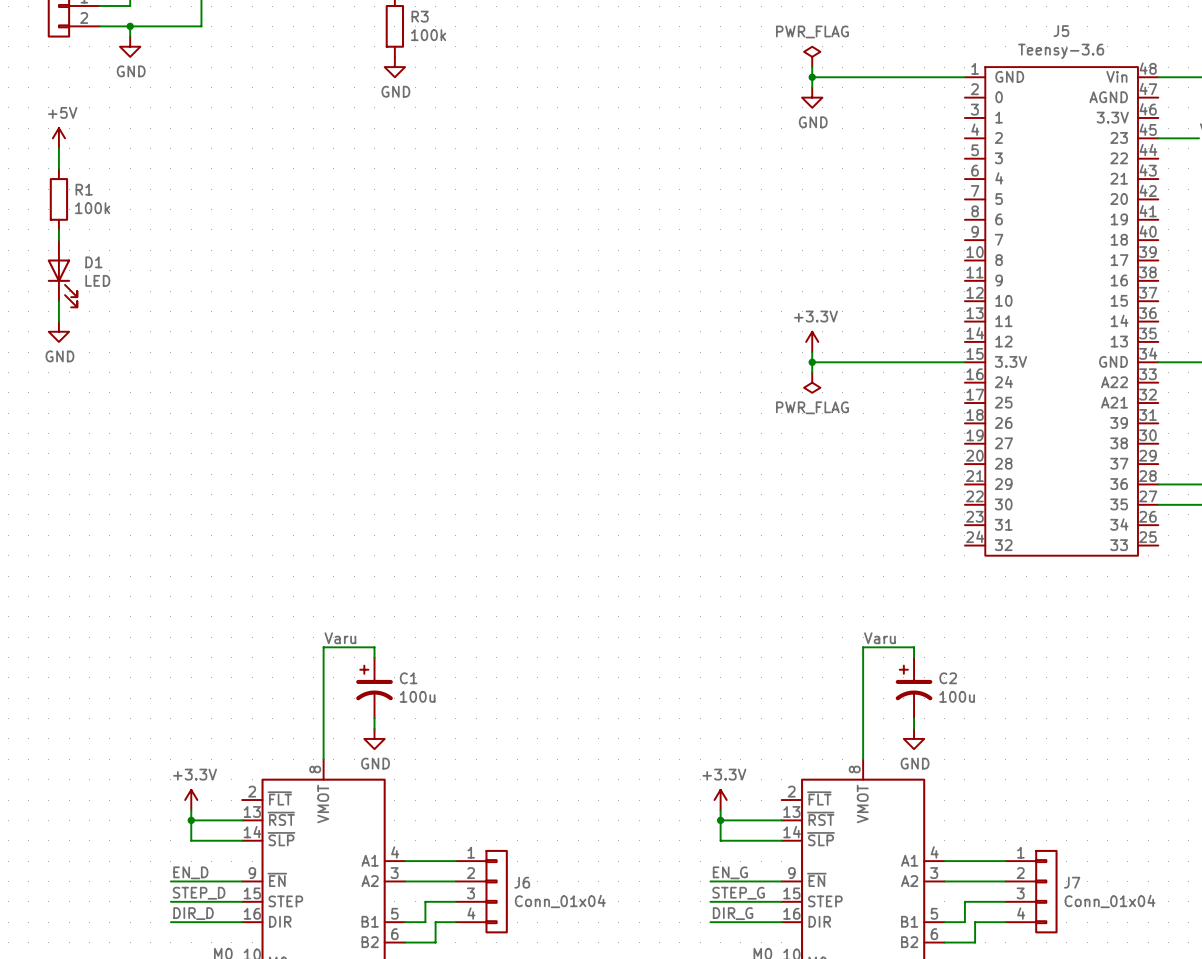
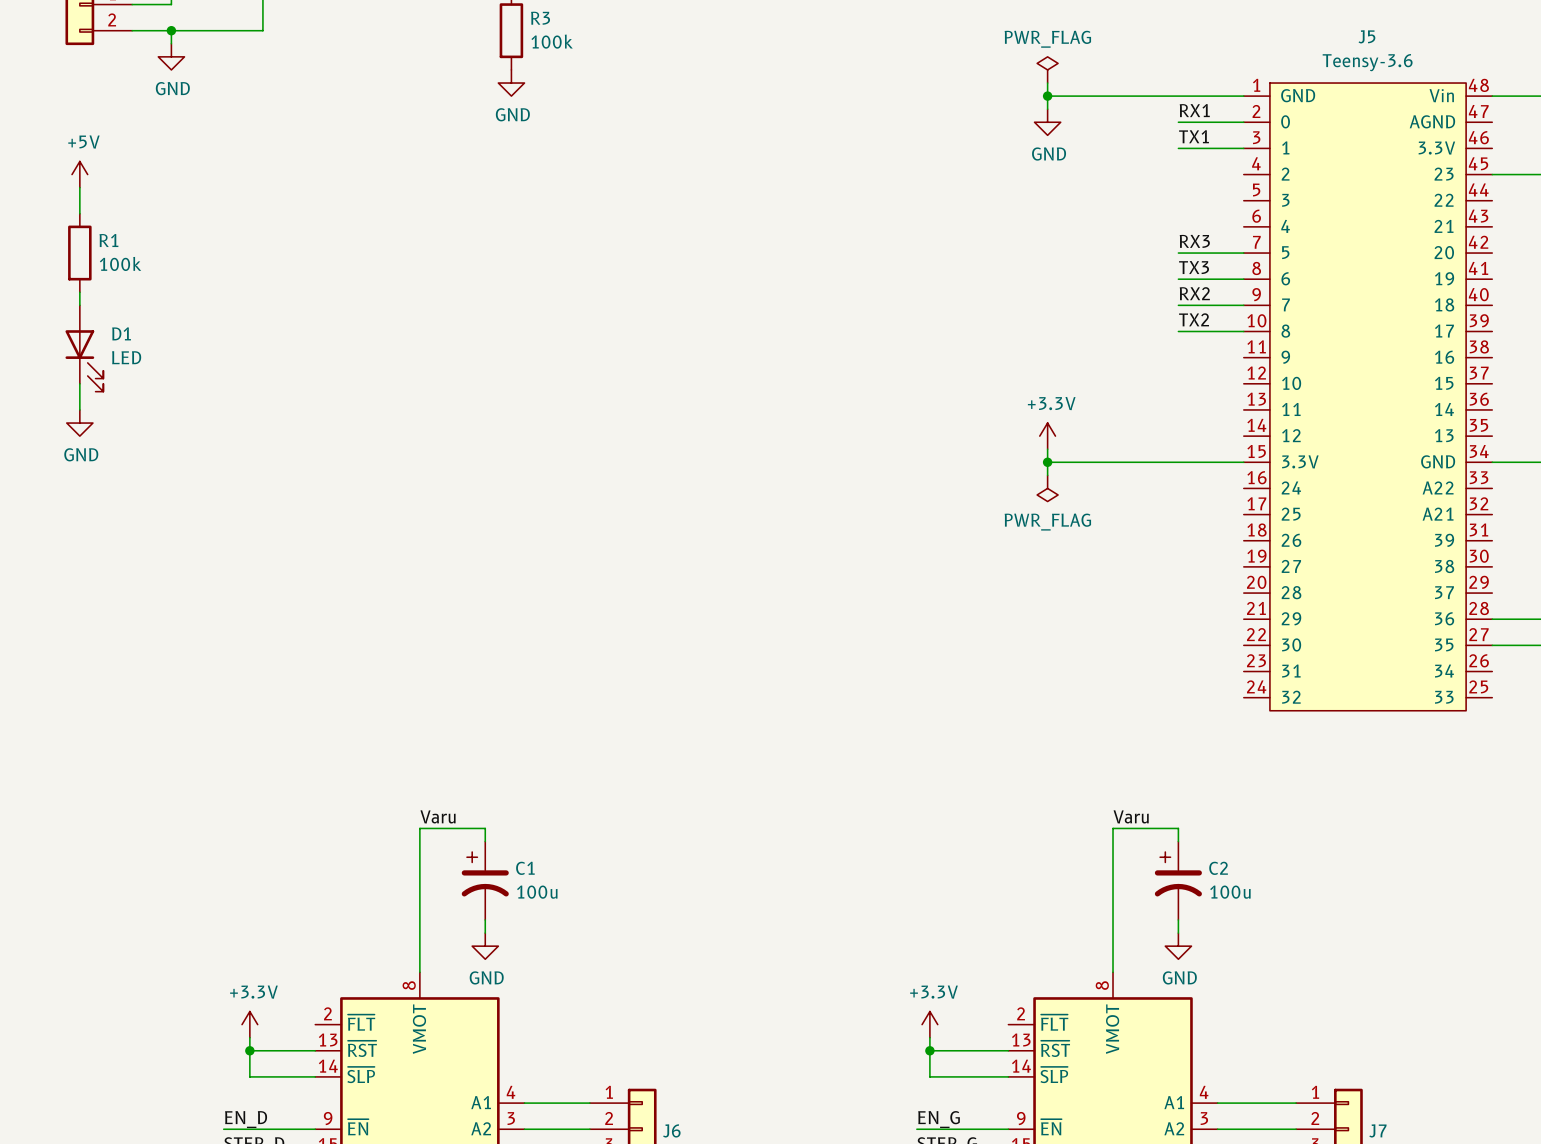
label: none -> RX1 (1194, 110)
wire: none -> (1178, 122) (1243, 122)
label: none -> TX1 (1194, 136)
wire: none -> (1178, 148) (1243, 148)
label: none -> RX3 (1194, 241)
wire: none -> (1178, 253) (1243, 253)
label: none -> TX3 (1194, 267)
wire: none -> (1178, 279) (1243, 279)
label: none -> RX2 (1194, 293)
wire: none -> (1178, 305) (1243, 305)
label: none -> TX2 (1194, 319)
wire: none -> (1178, 331) (1243, 331)

